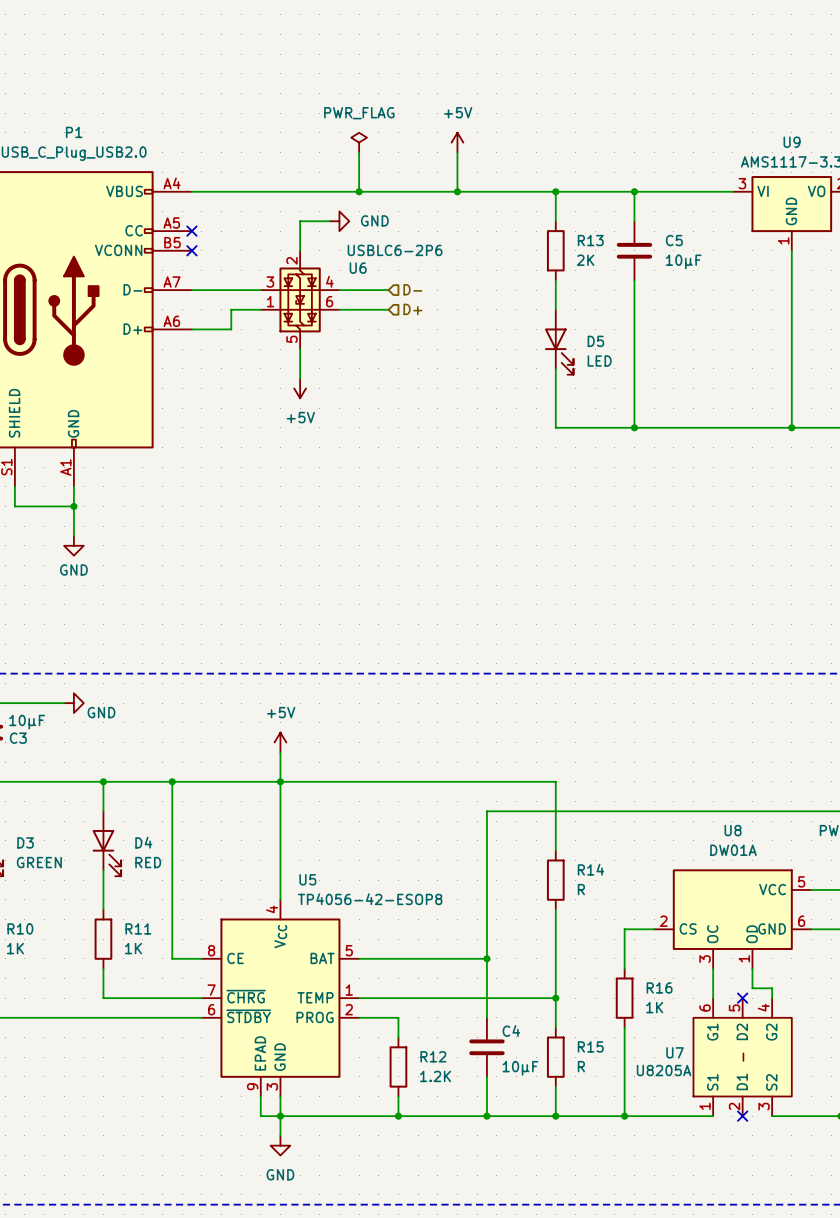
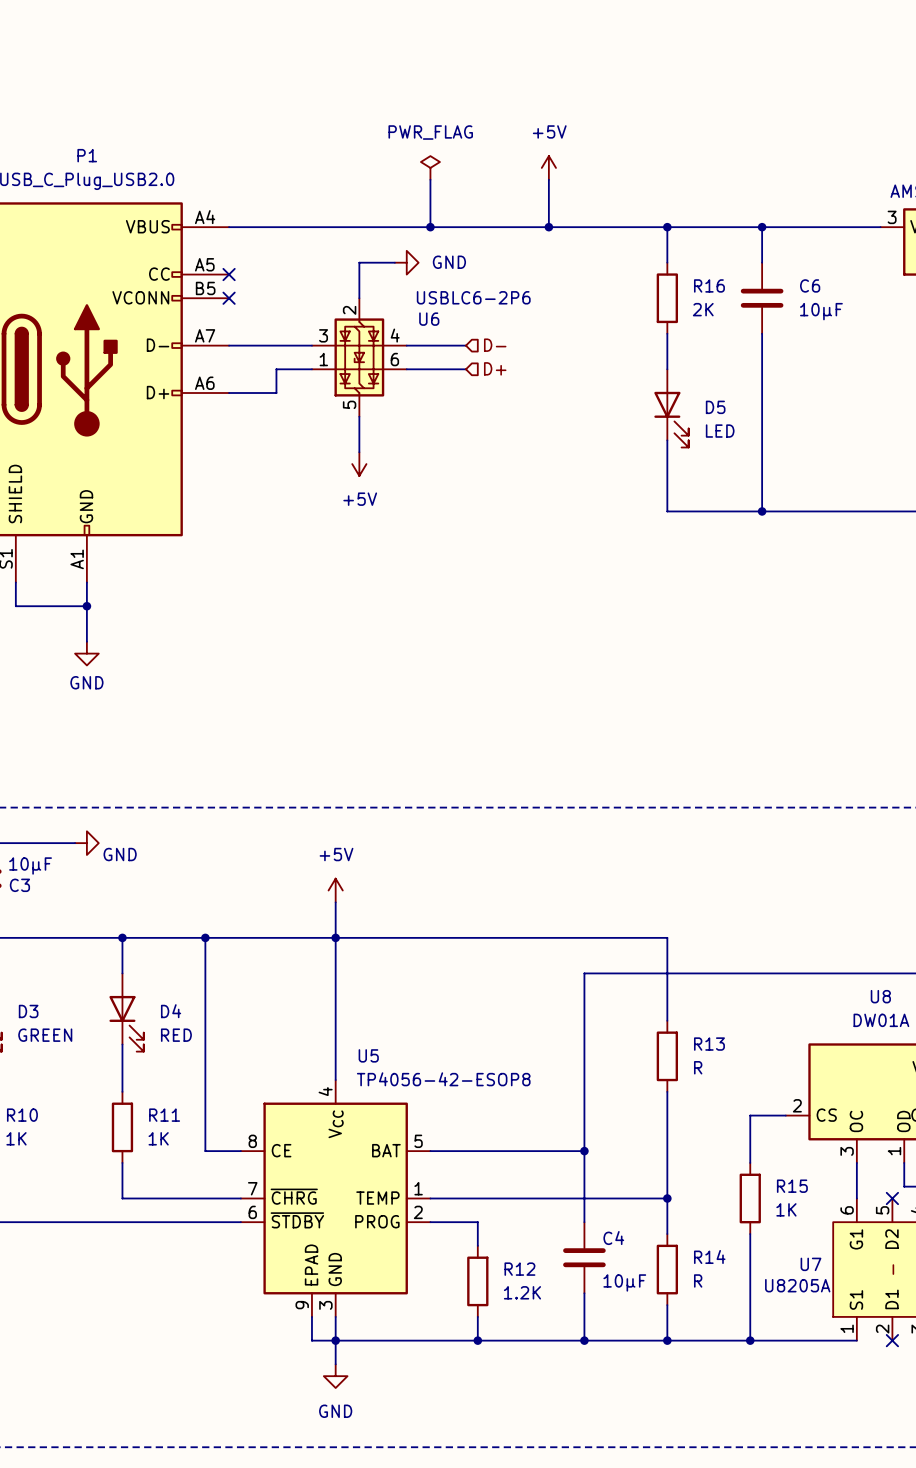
R13 name: R13 (590, 240) -> R16 (709, 285)
C5 name: C5 (674, 240) -> C6 (810, 285)
R14 name: R14 (590, 869) -> R13 (709, 1044)
R16 name: R16 (659, 987) -> R15 (792, 1186)
R15 name: R15 (590, 1046) -> R14 (709, 1256)

